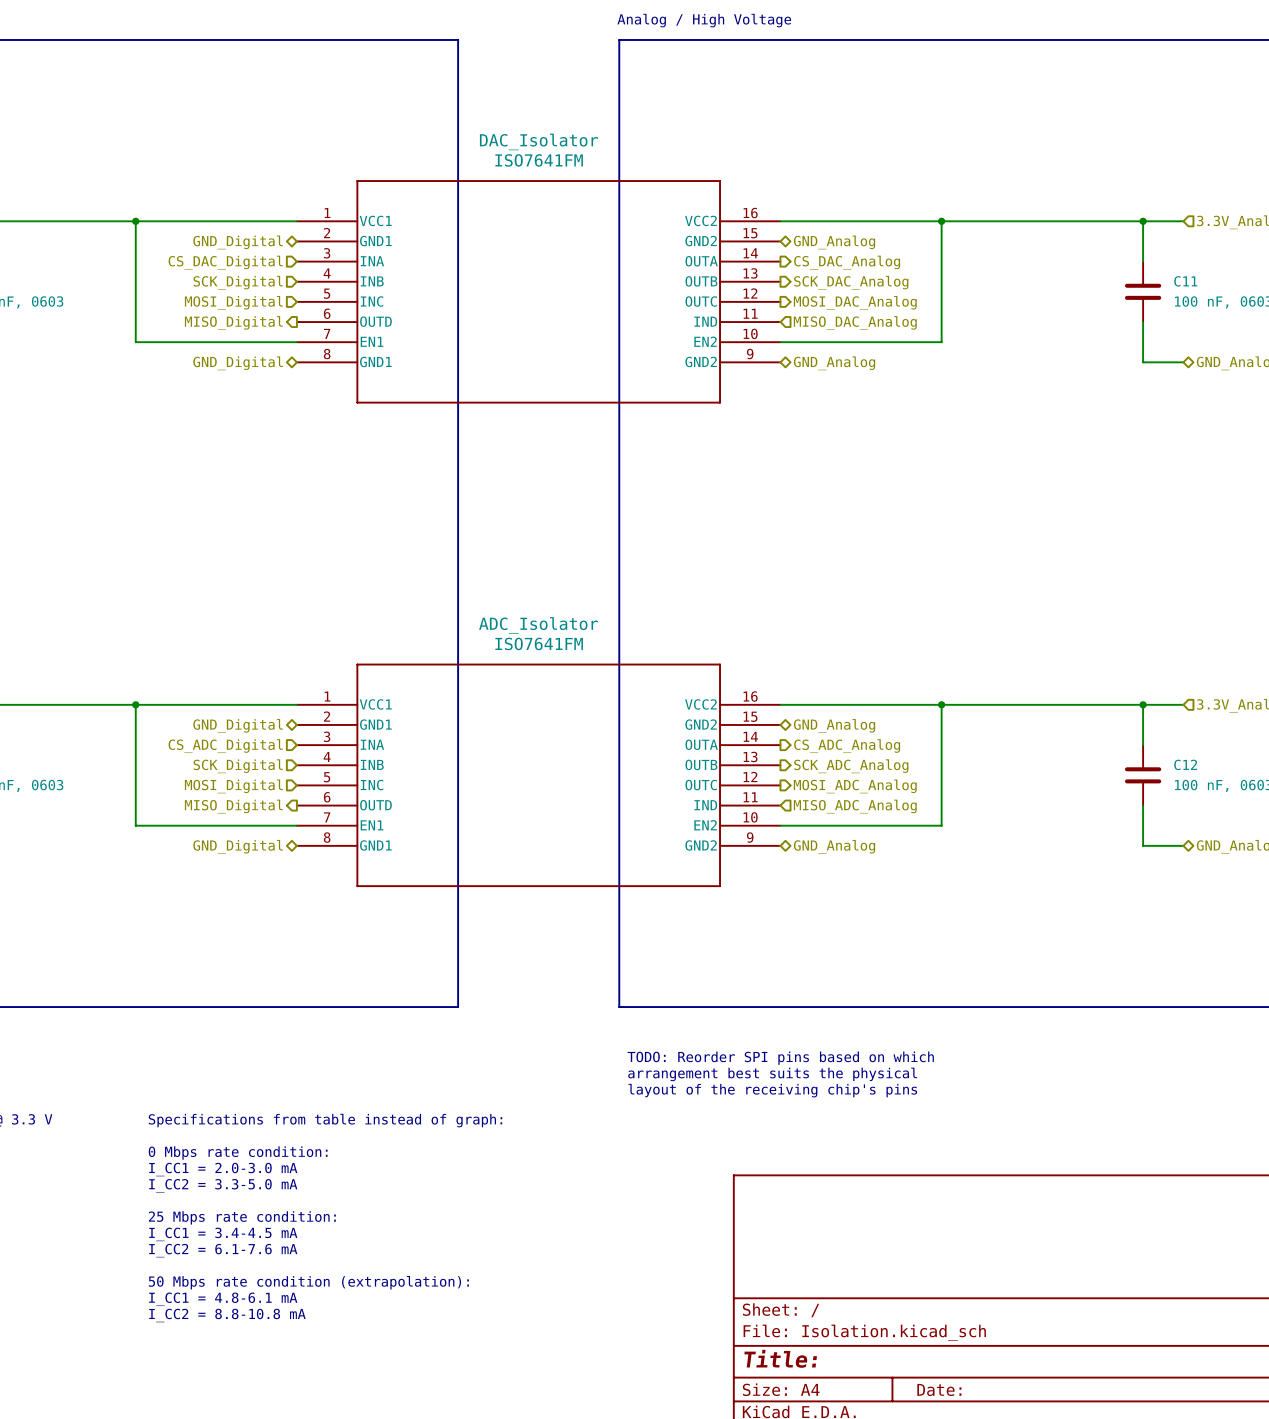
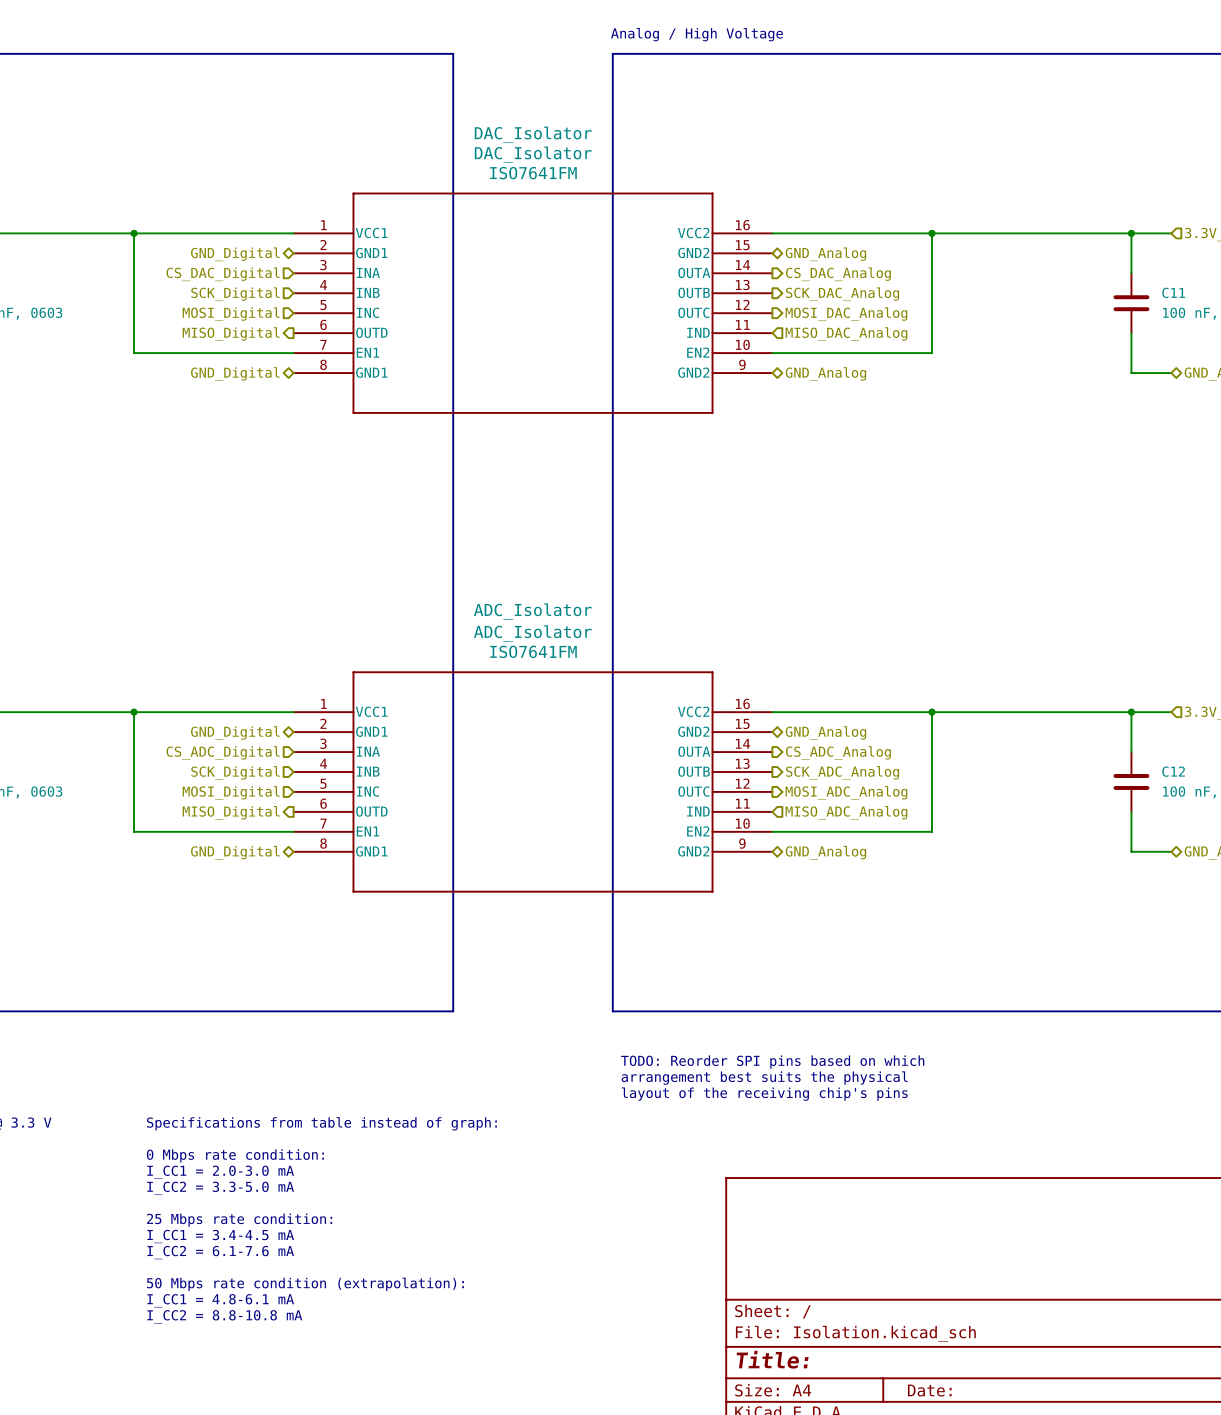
DAC_Isolator text: none -> DAC_Isolator (533, 134)
ADC_Isolator text: none -> ADC_Isolator (532, 611)

